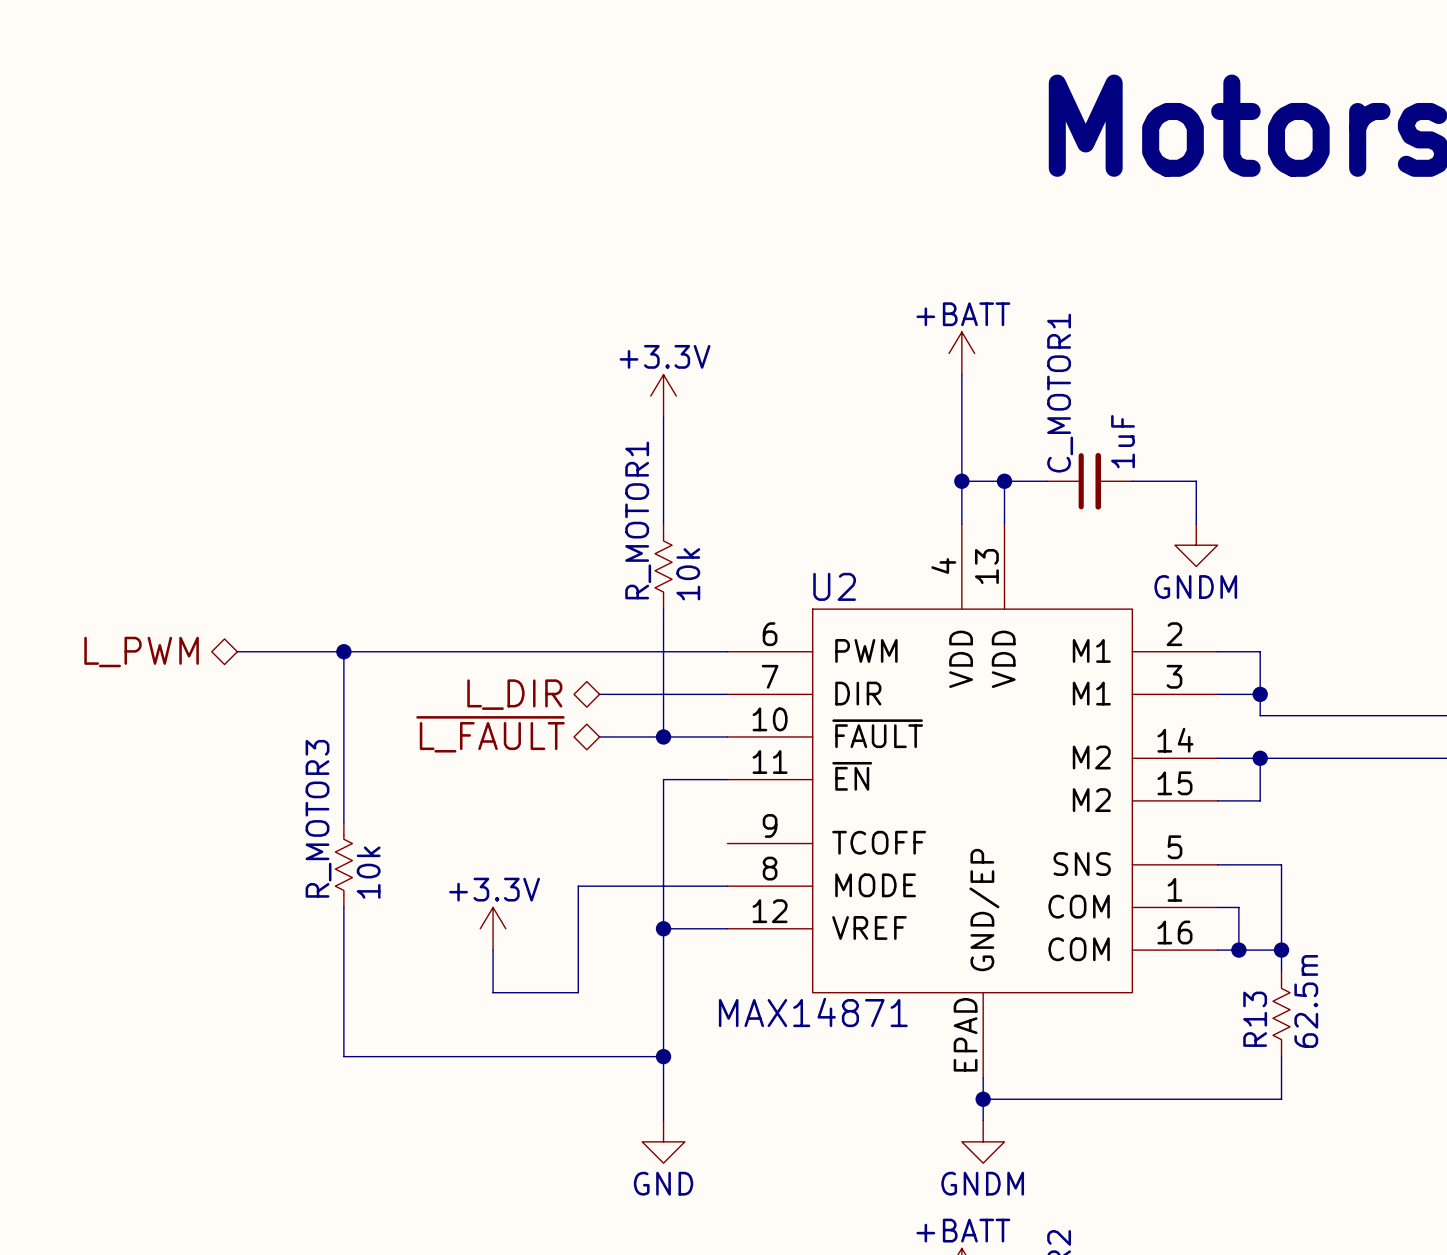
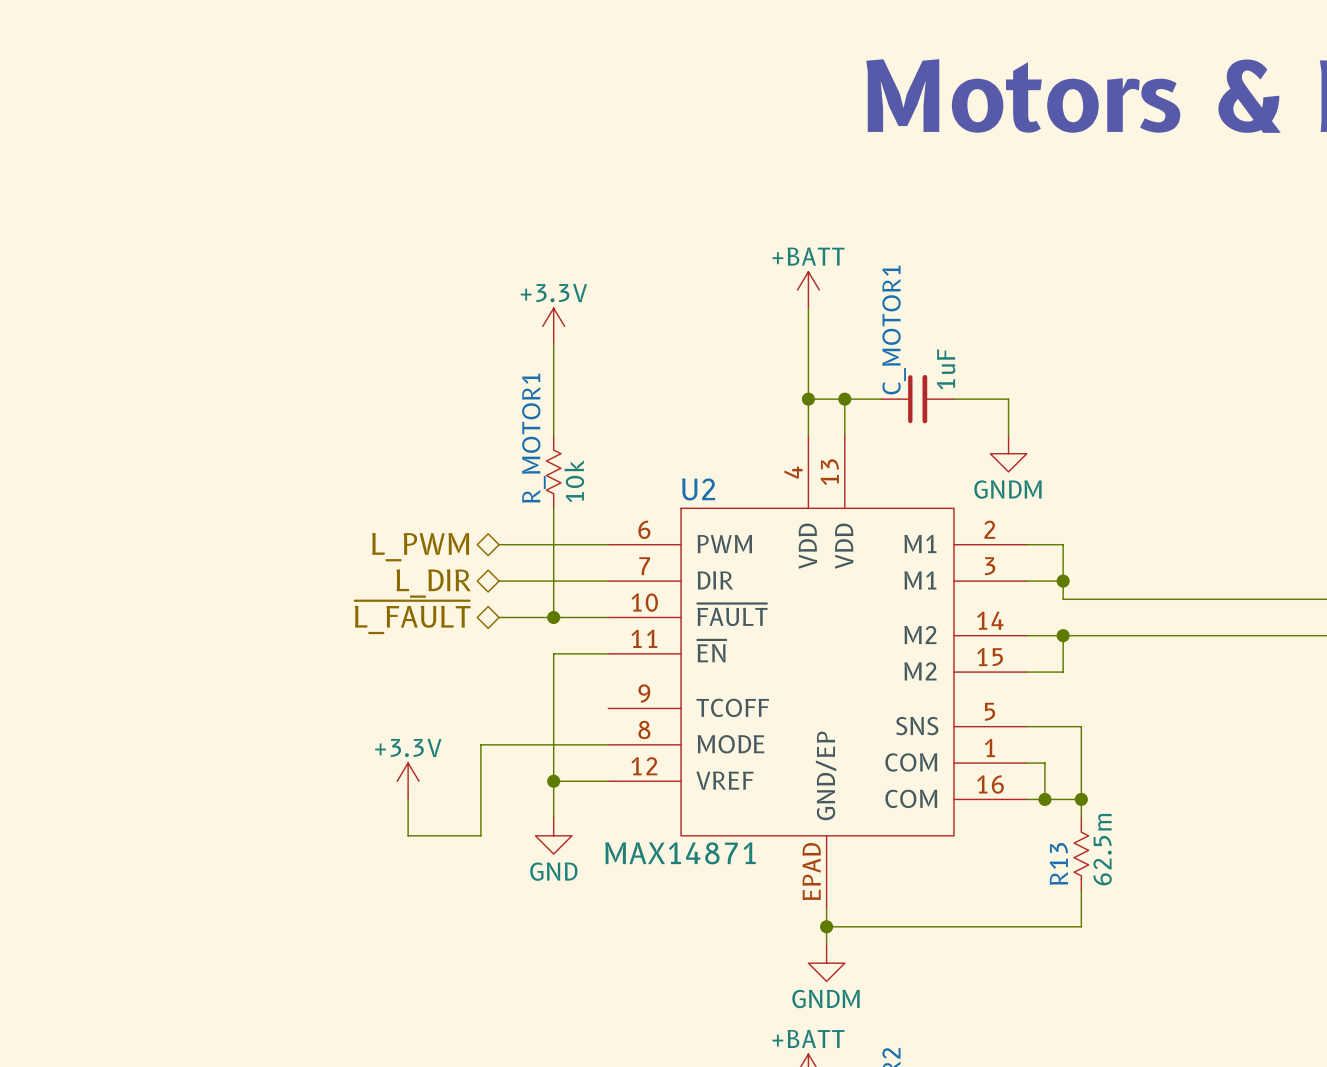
wire: (237, 651) (599, 651) -> none
wire: (343, 651) (343, 822) -> none
junction: (343, 651) -> none
hierarchical label position: L_PWM (141, 652) -> L_PWM (420, 547)
R_MOTOR3: 10k (343, 864) -> none
wire: (343, 907) (343, 1056) (663, 1056) -> none
wire: (663, 971) (663, 1120) -> none
junction: (663, 1056) -> none
power symbol position: GND (663, 1141) -> GND (553, 835)

